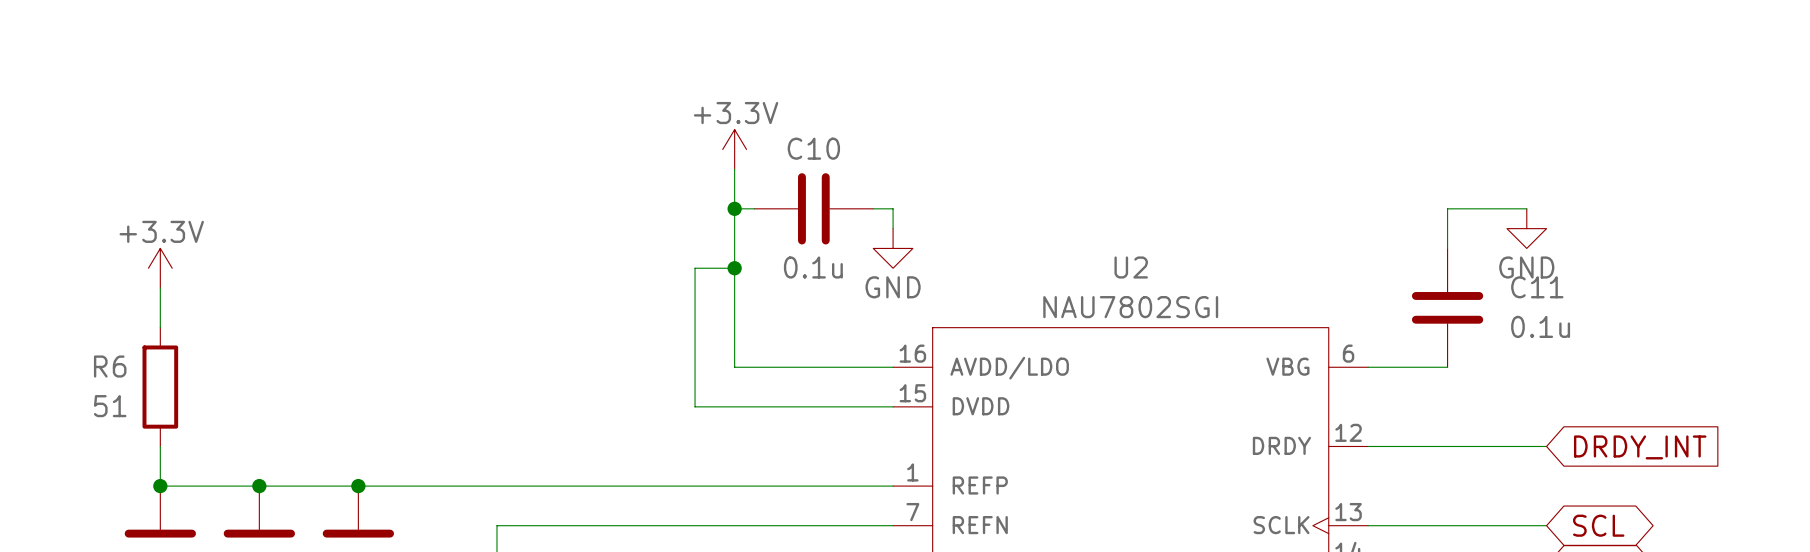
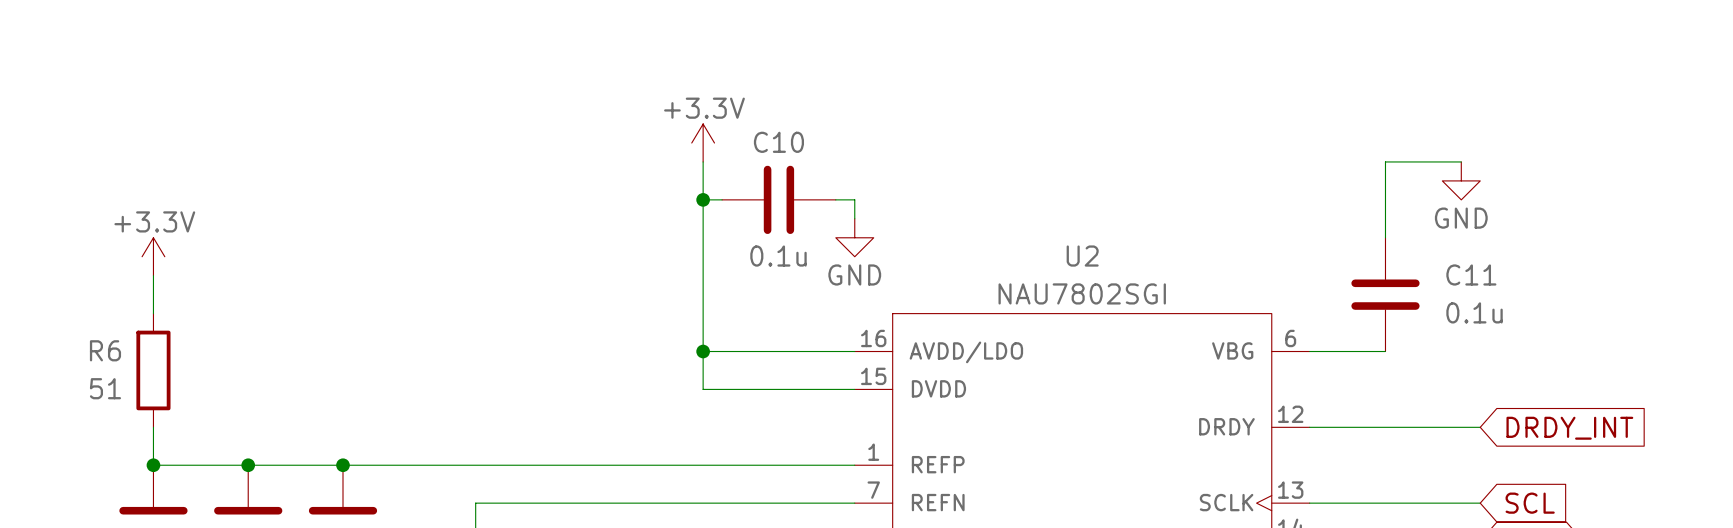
wire: (1447, 208) (1526, 208) -> (1385, 199) (1385, 161) (1461, 161)
power symbol position: GND (1526, 228) -> GND (1461, 180)
wire: (734, 268) (695, 268) (695, 406) (734, 406) -> (703, 351) (703, 389)
junction: (734, 268) -> none
junction: none -> (703, 351)
global label shape: bidirectional (1598, 525) -> input (1530, 503)

